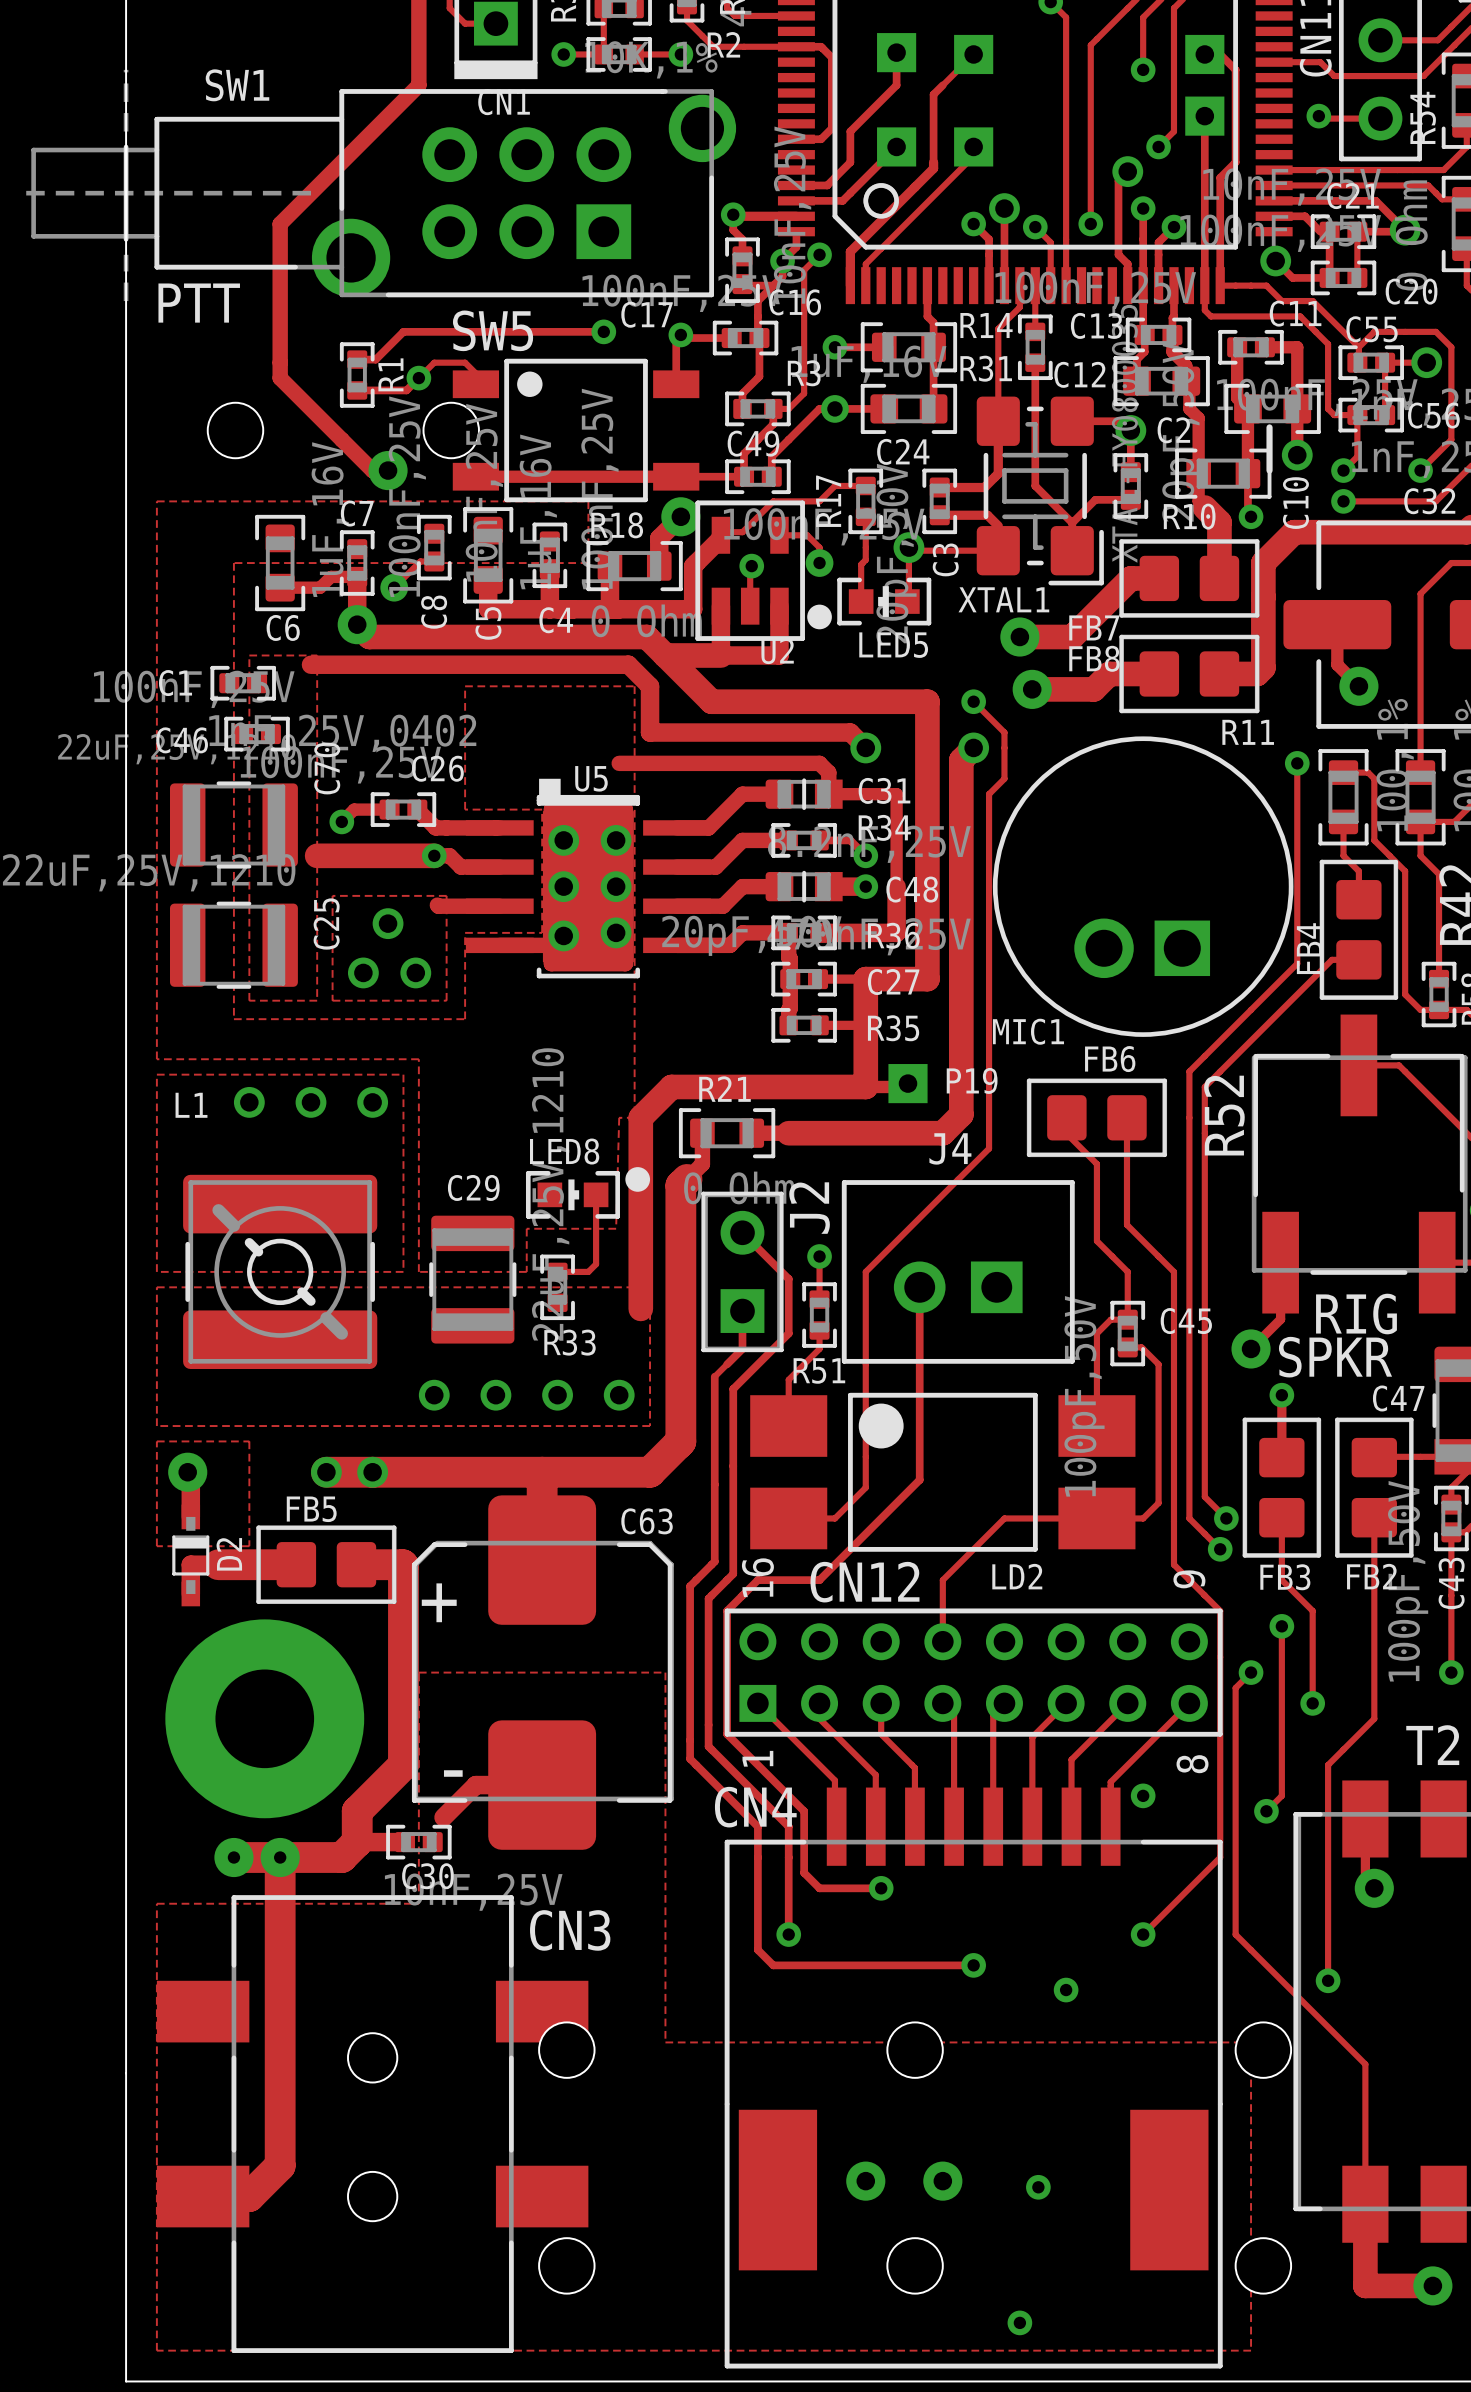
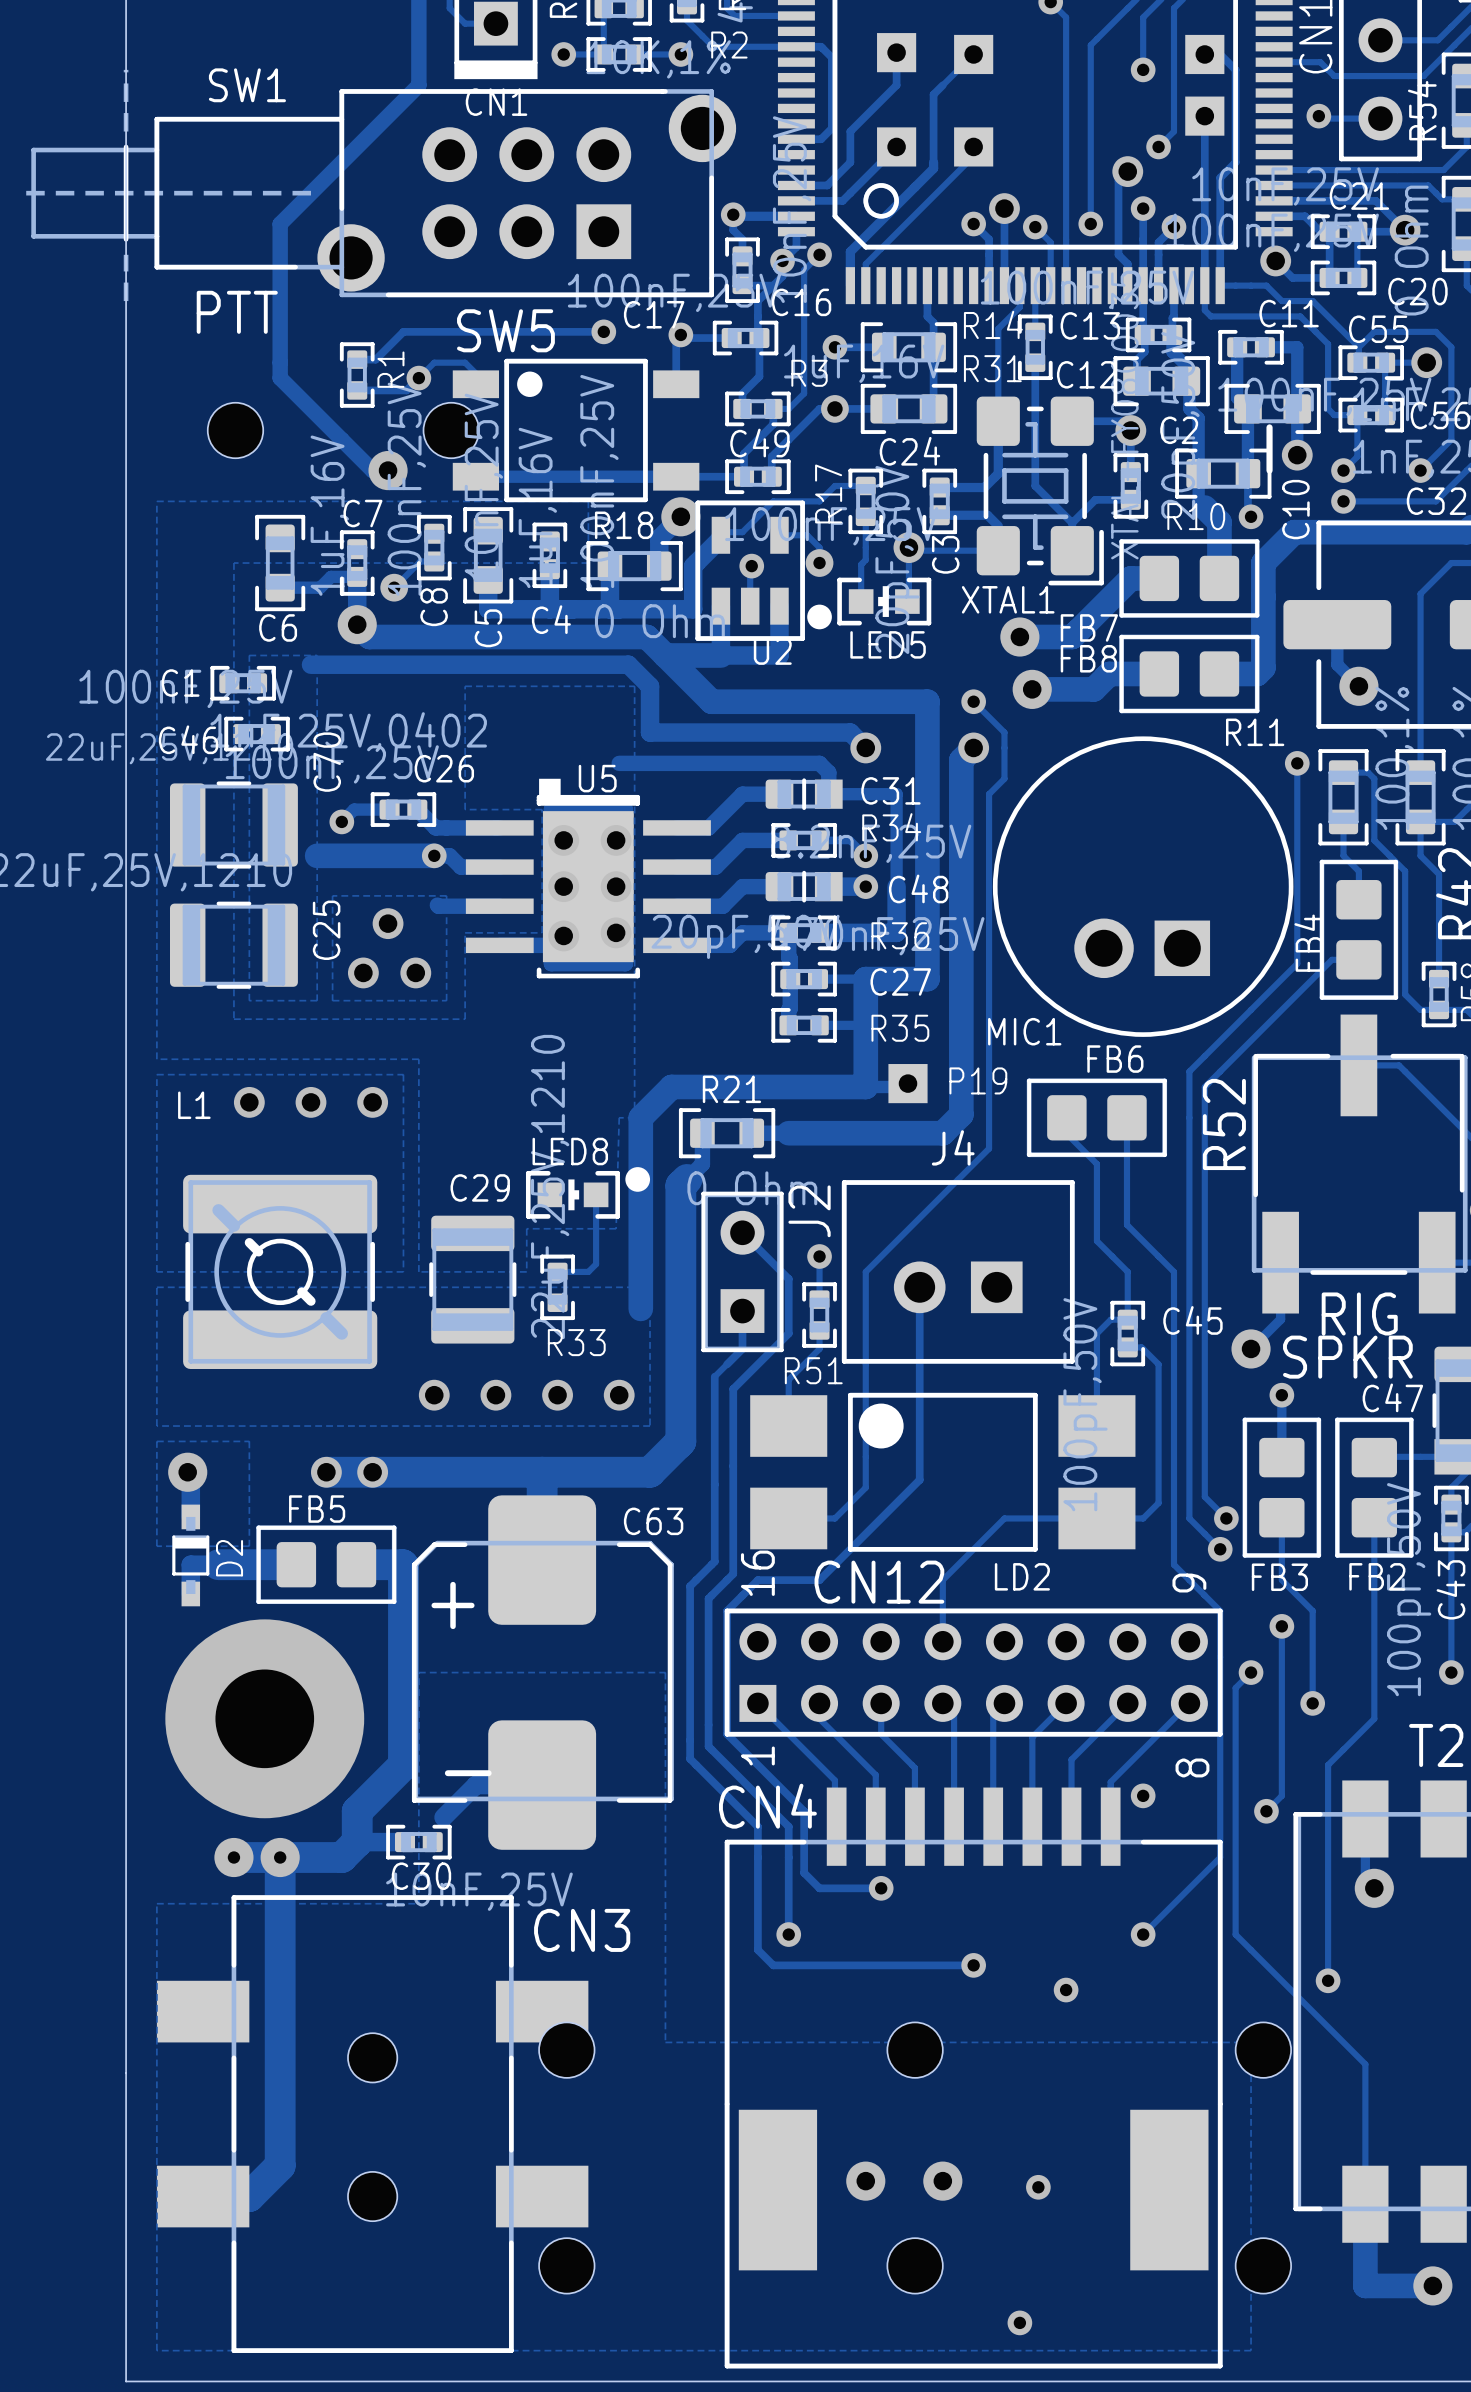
SW1 footprint: [15, 67, 737, 304] -> [15, 67, 737, 304]
text position: PTT (199, 303) -> PTT (237, 312)

